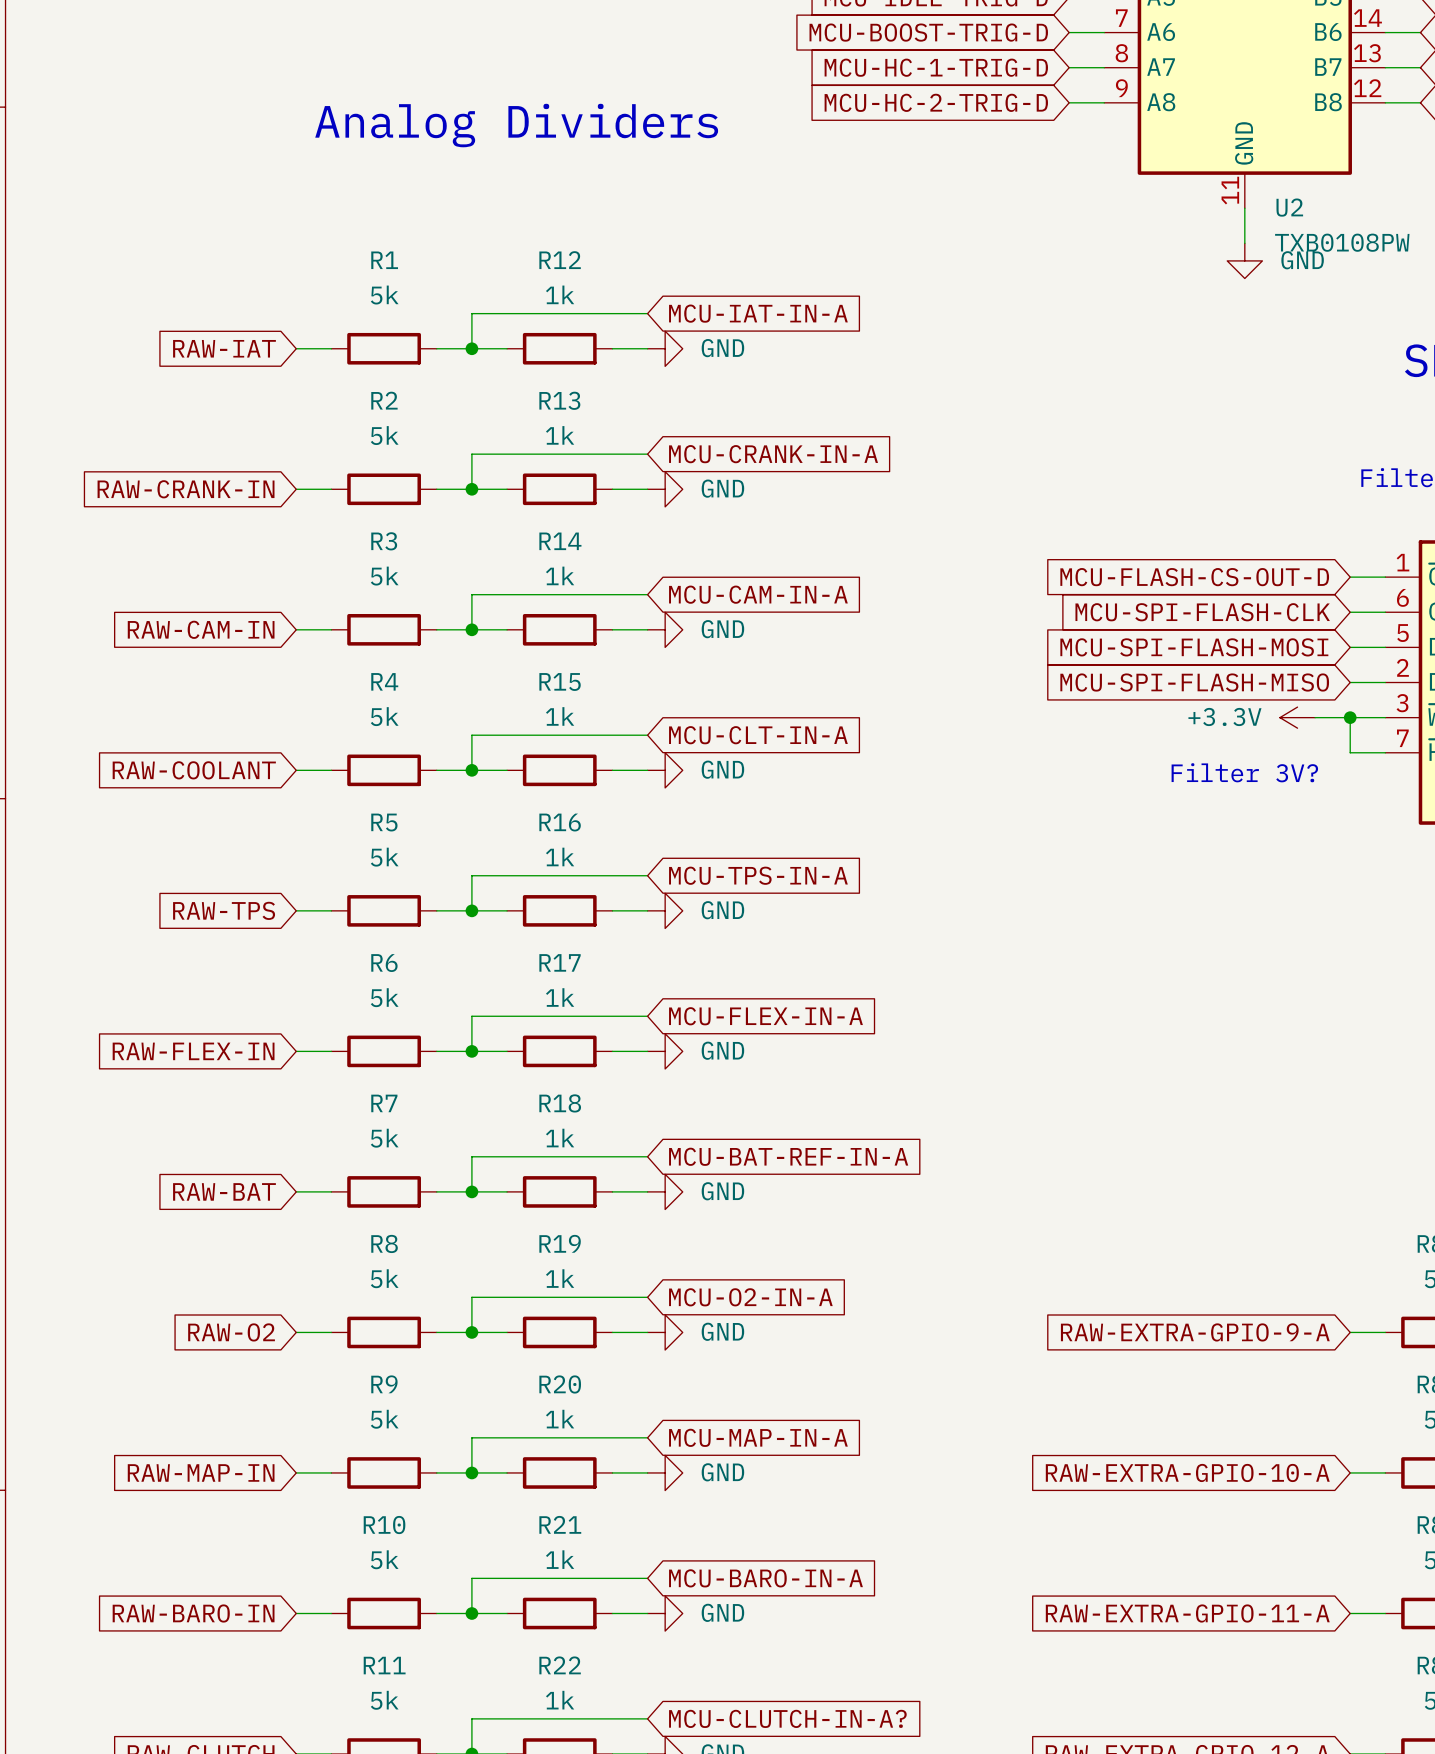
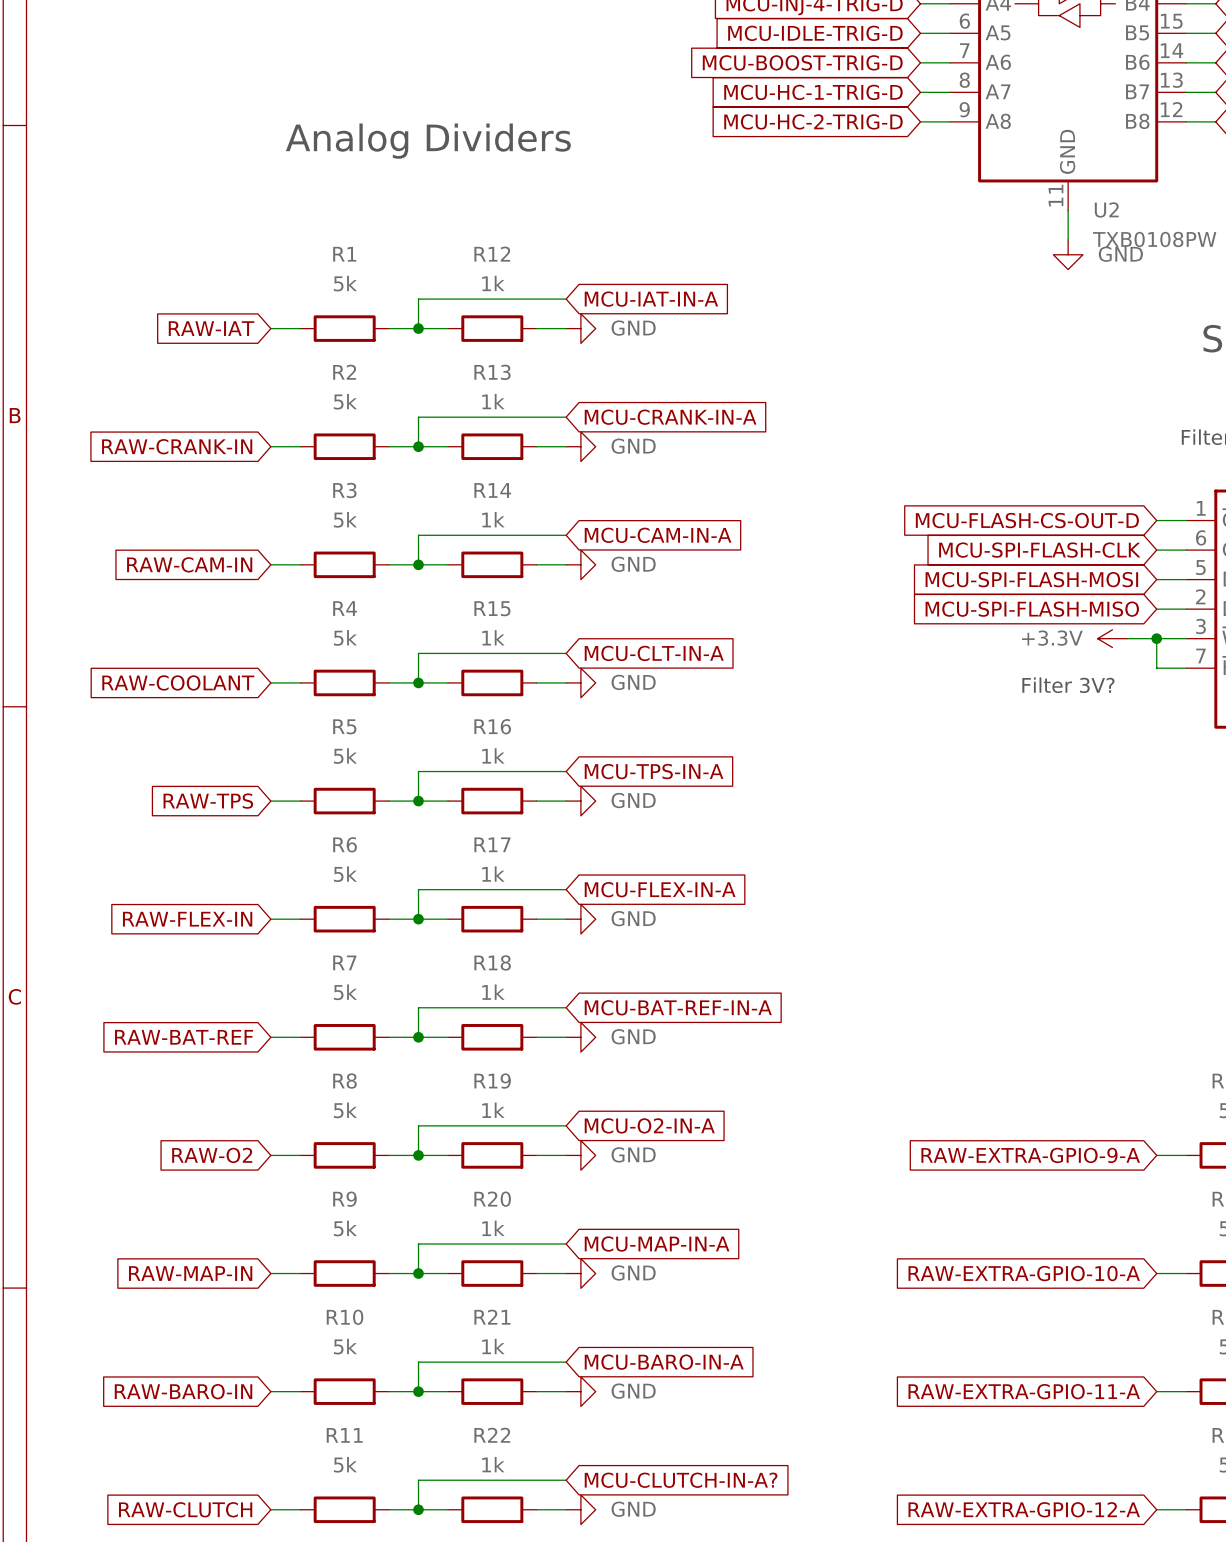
global label: RAW-BAT (224, 1191) -> RAW-BAT-REF (184, 1037)

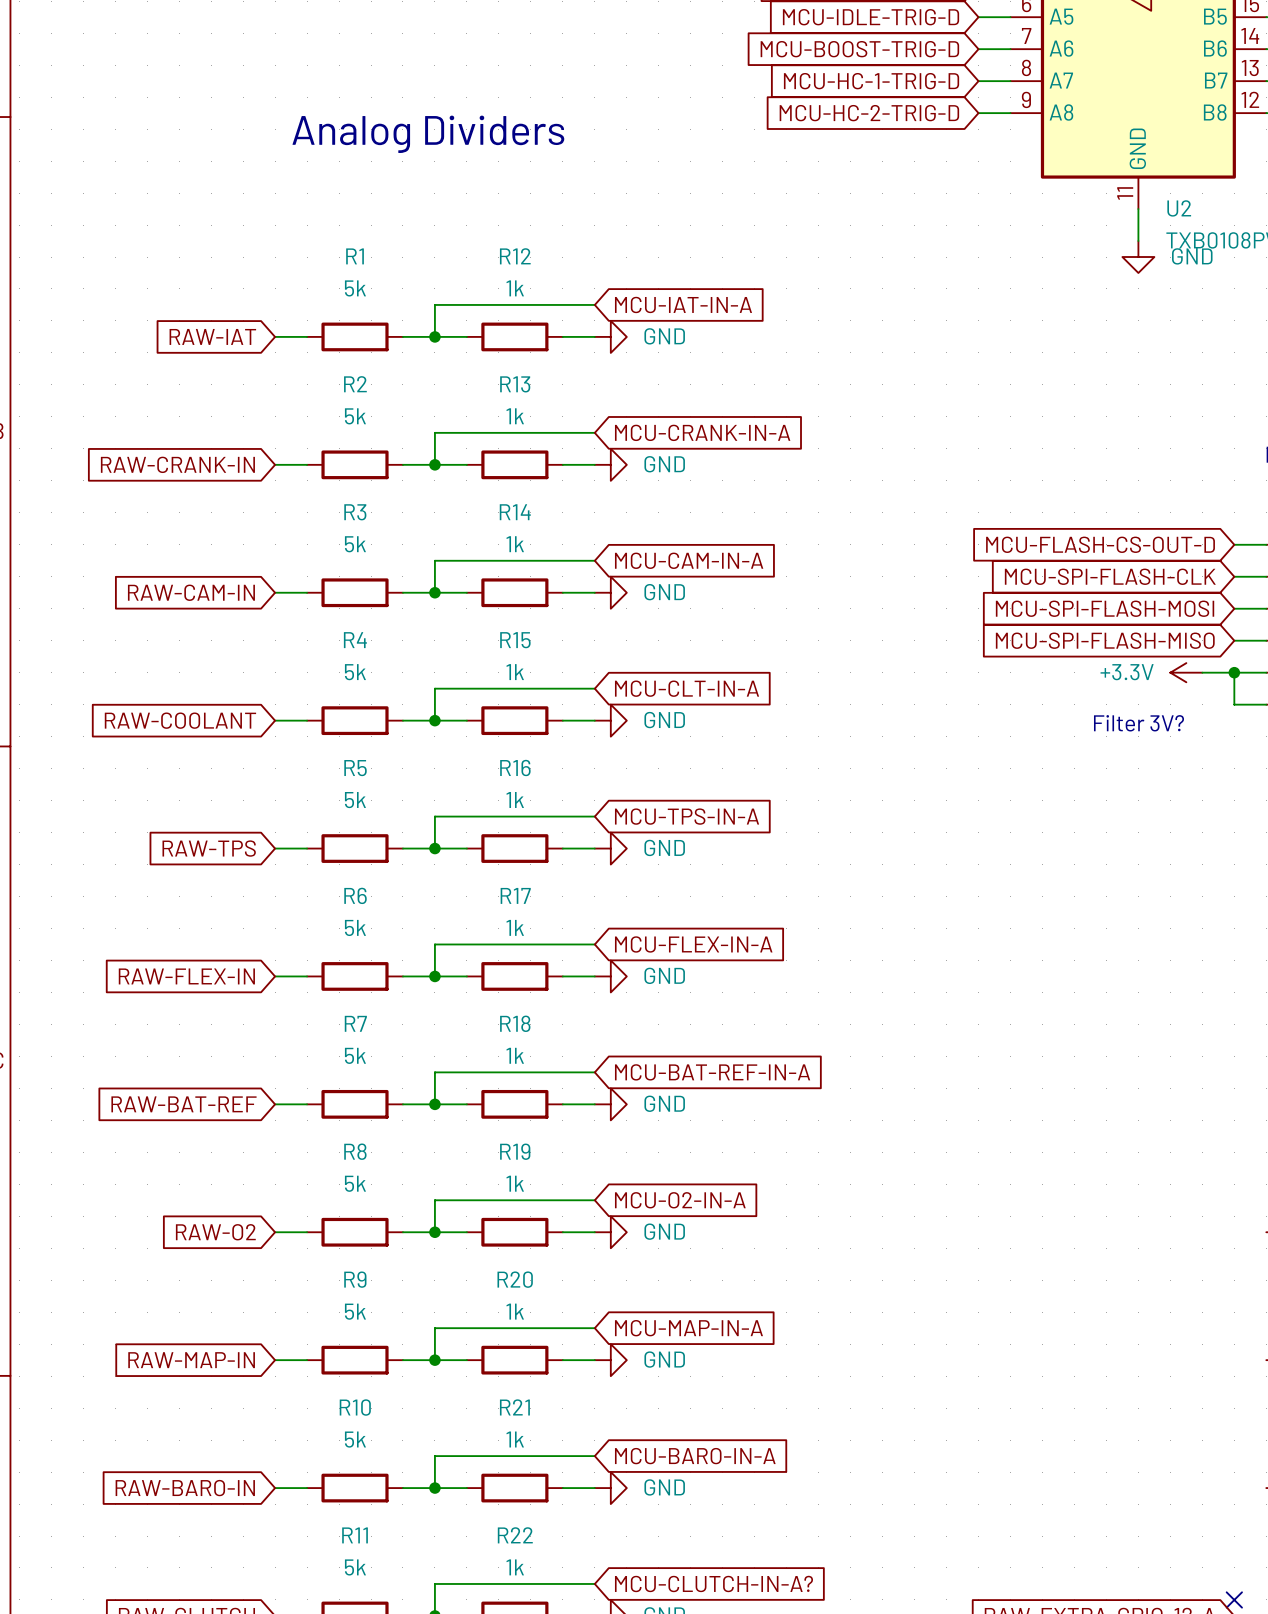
global label: RAW-EXTRA-GPIO-9-A (1030, 1155) -> none
wire: (1156, 1155) (1186, 1155) -> none
global label: RAW-EXTRA-GPIO-10-A (1024, 1273) -> none
wire: (1156, 1273) (1186, 1273) -> none
global label: RAW-EXTRA-GPIO-11-A (1024, 1391) -> none
wire: (1156, 1391) (1186, 1391) -> none
no-connect mark: none -> (1234, 1599)

